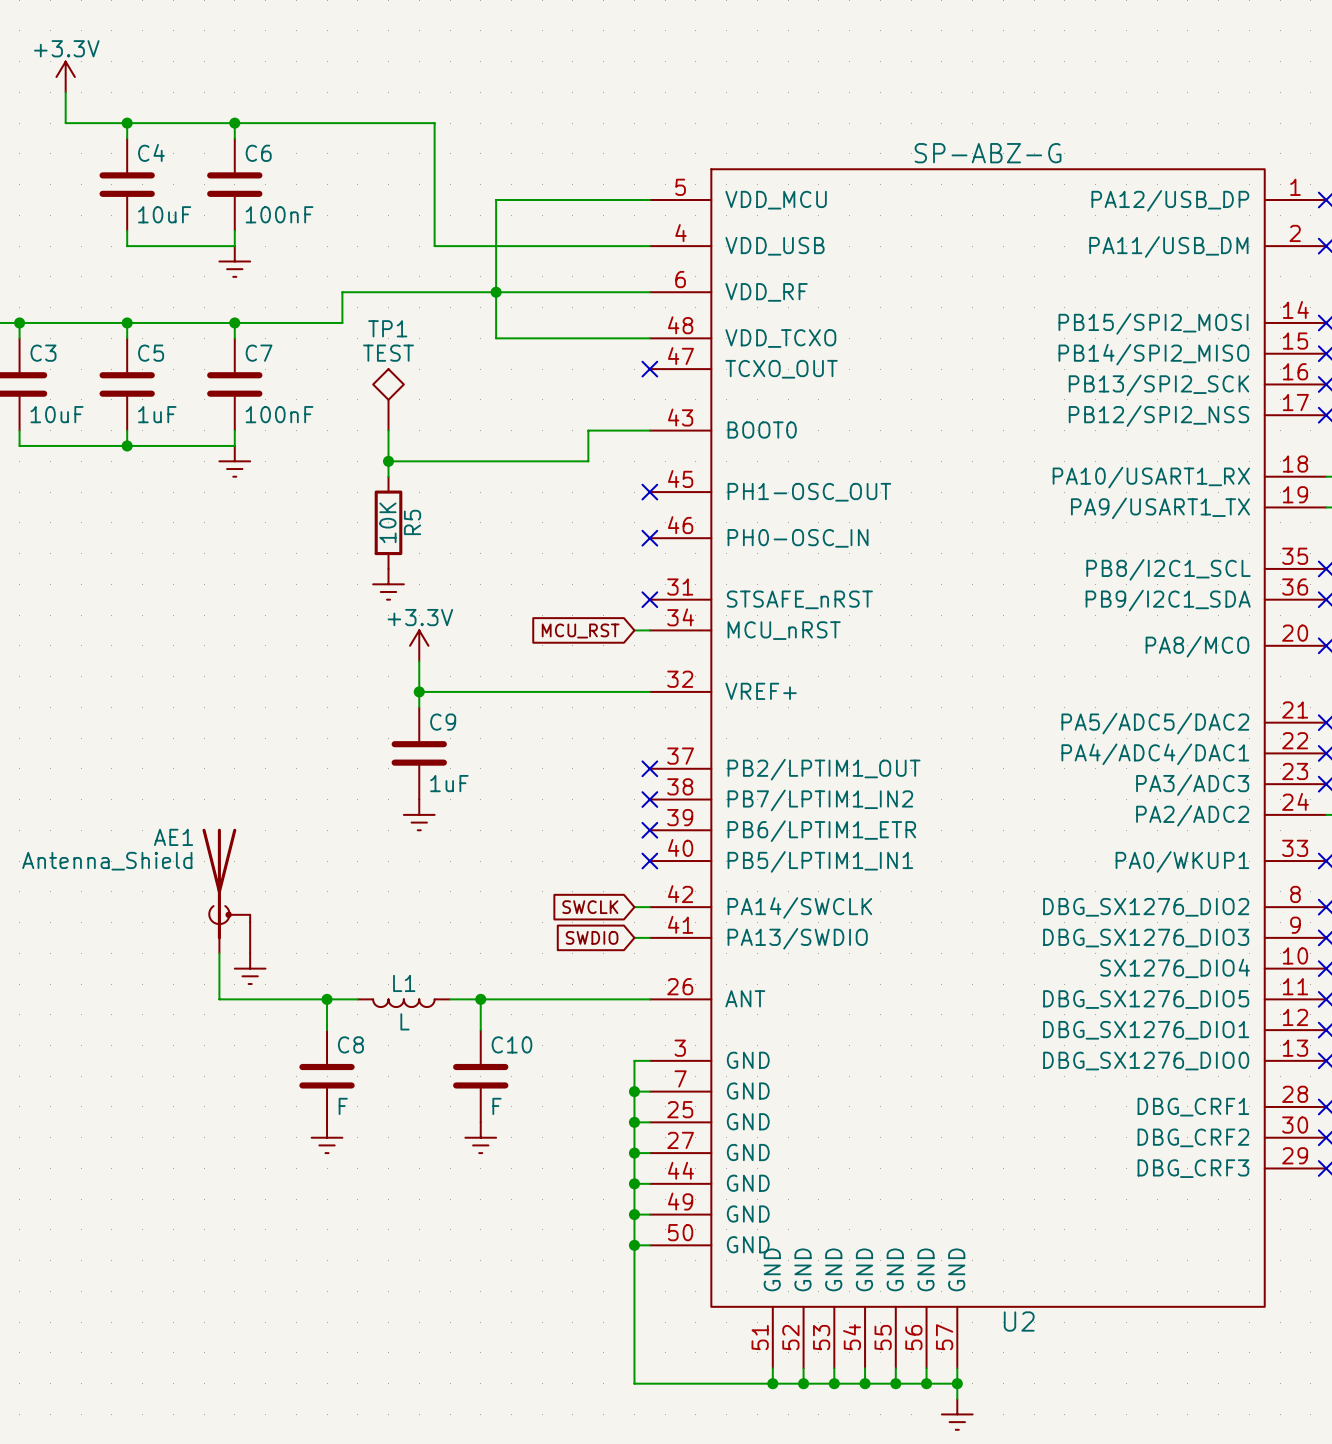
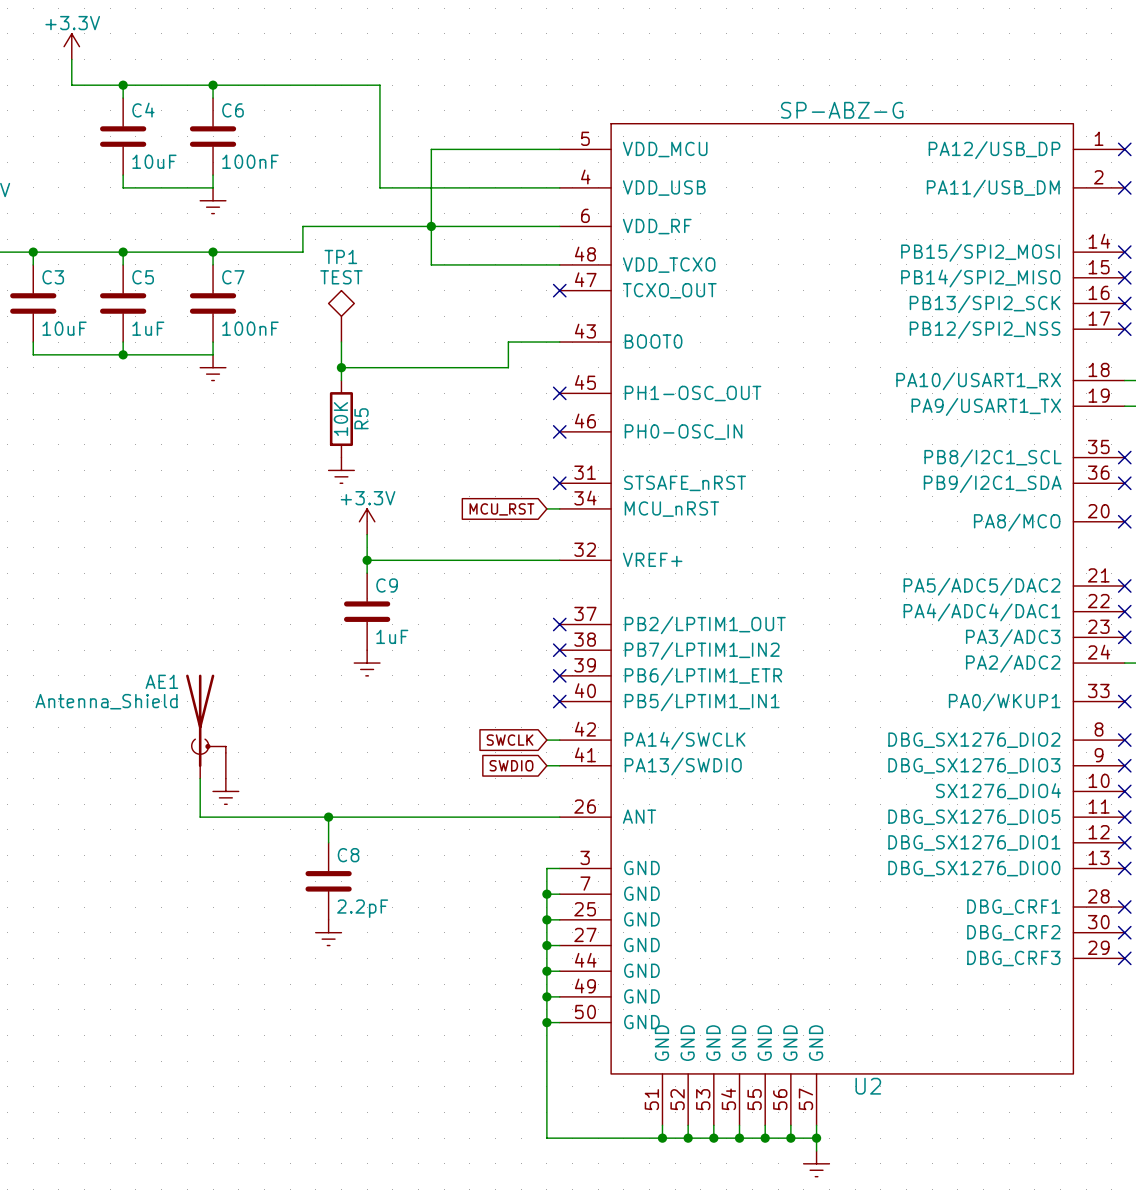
wire: (327, 999) (327, 1030) -> (328, 817) (328, 842)
junction position: (327, 999) -> (328, 817)
wire: none -> (315, 817) (392, 817)
wire: (480, 999) (480, 1030) -> none
junction: (480, 999) -> none
L1: L (403, 1003) -> none
C8 position: (327, 1076) -> (328, 881)
C10: F (480, 1076) -> none
C8 value: F (343, 1106) -> 2.2pF (362, 908)
power symbol position: (327, 1137) -> (328, 932)
power symbol: (480, 1137) -> none

